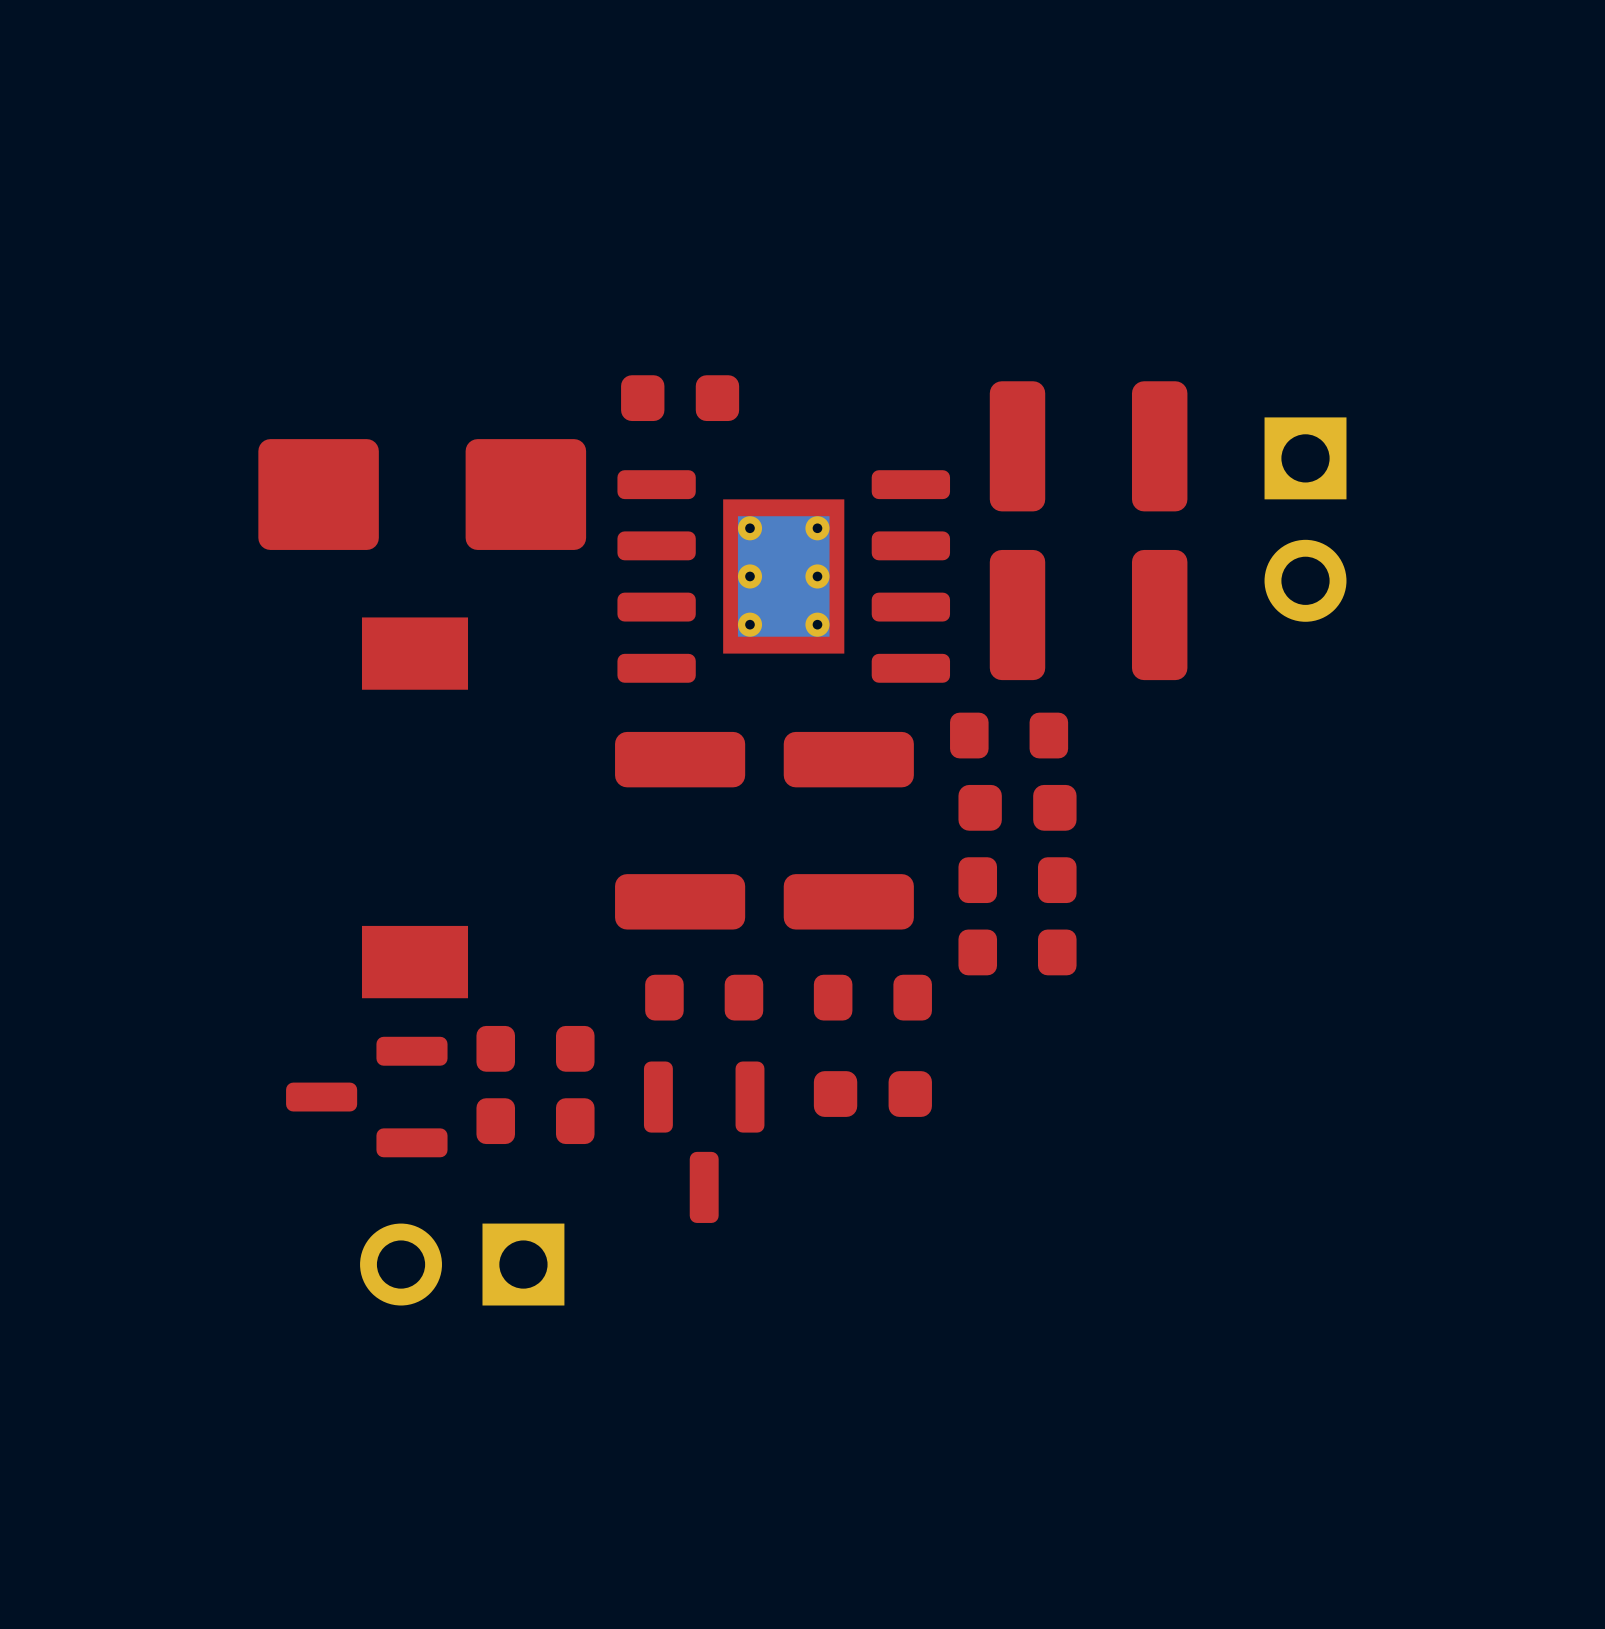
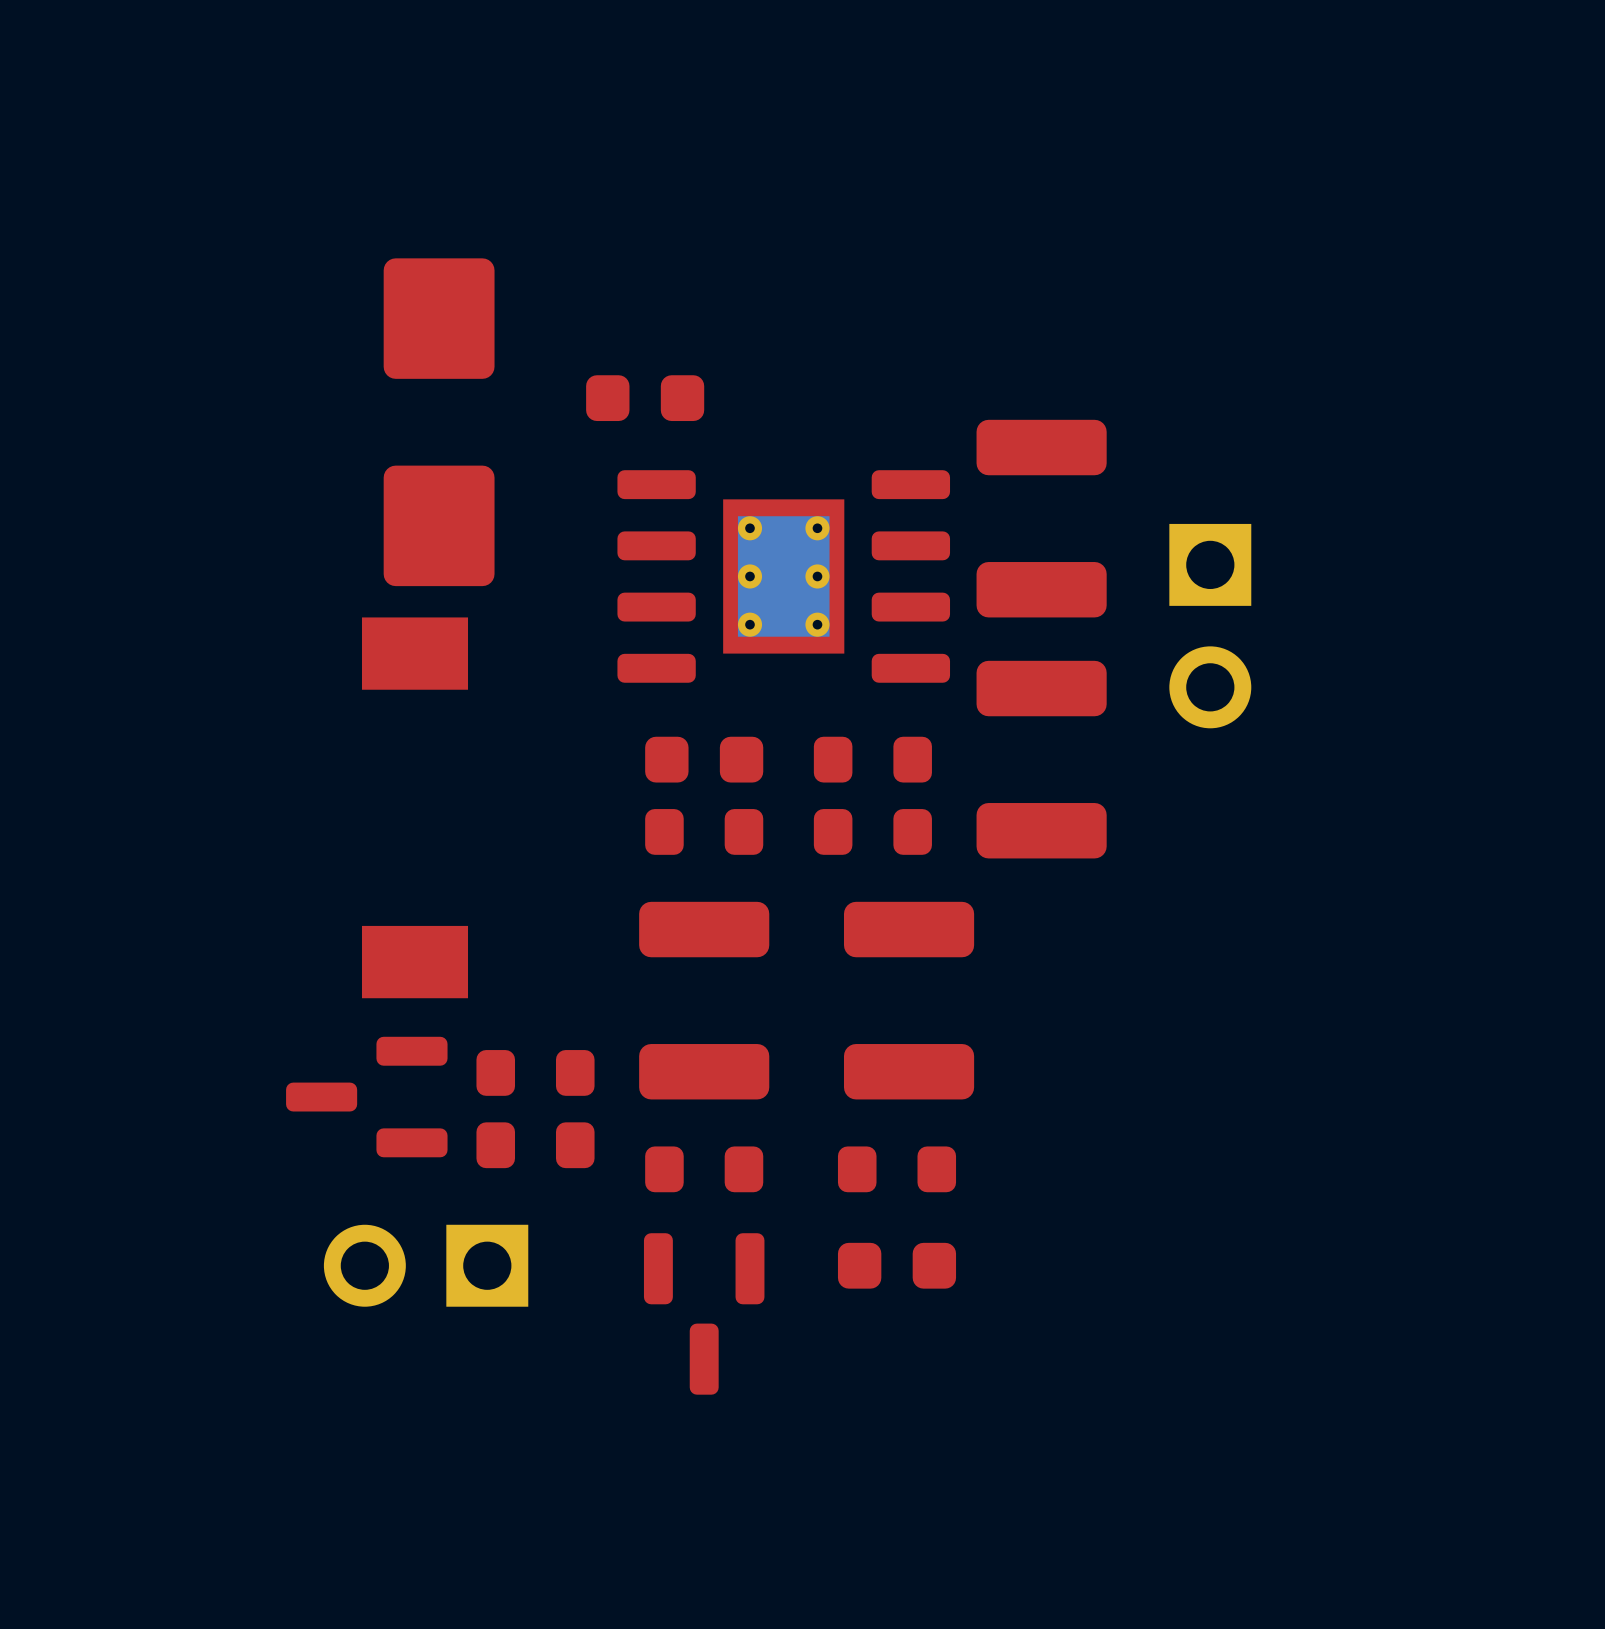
part position: (680, 398) -> (645, 398)
part: (1088, 446) -> none
part rotation: 0° (422, 494) -> 90° clockwise (439, 422)
part: none -> (1041, 518)
part position: (1305, 519) -> (1210, 626)
part: (1088, 615) -> none
part footprint: [615, 731, 746, 930] -> [645, 809, 764, 855]
part footprint: [783, 731, 914, 930] -> [813, 809, 932, 855]
part: (1009, 735) -> none
part: none -> (704, 759)
part: none -> (872, 759)
part: none -> (1041, 759)
part: (1017, 807) -> none
part: (1017, 880) -> none
part: (1017, 952) -> none
part footprint: [645, 974, 764, 1021] -> [639, 901, 770, 1100]
part footprint: [813, 974, 932, 1021] -> [843, 901, 975, 1100]
part: (535, 1048) -> none
part footprint: [643, 1061, 765, 1223] -> [645, 1146, 764, 1193]
part: none -> (535, 1072)
part position: (872, 1094) -> (897, 1265)
part: (535, 1121) -> none
part: none -> (535, 1145)
part: none -> (897, 1169)
part position: (462, 1264) -> (426, 1265)
part: none -> (704, 1313)

